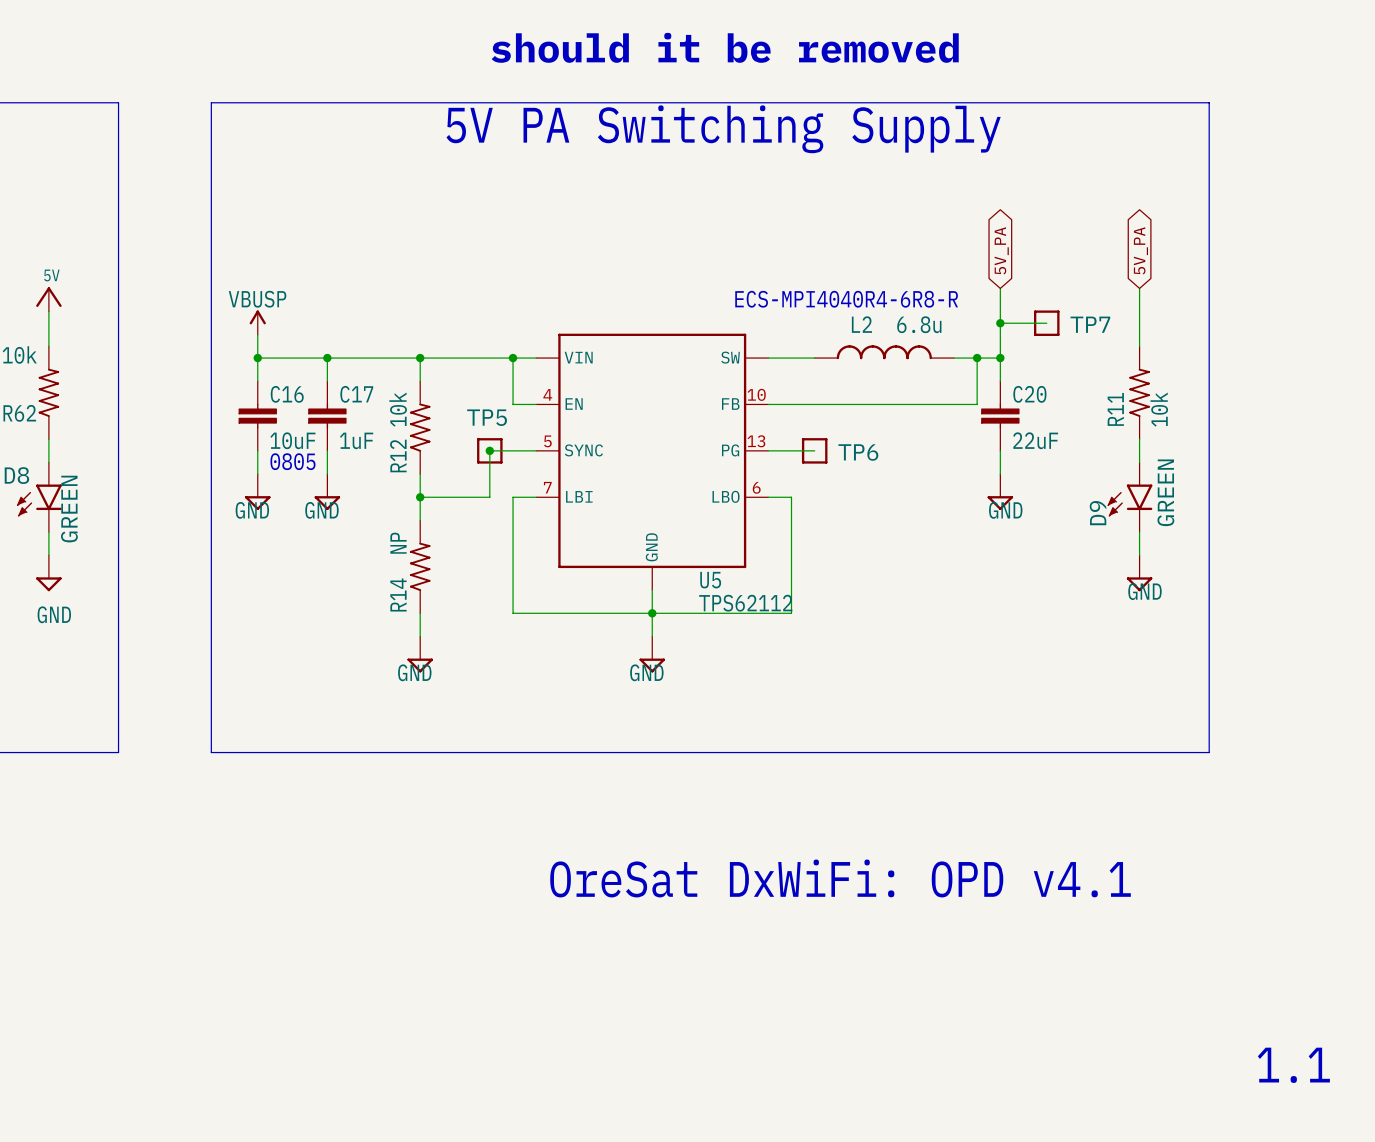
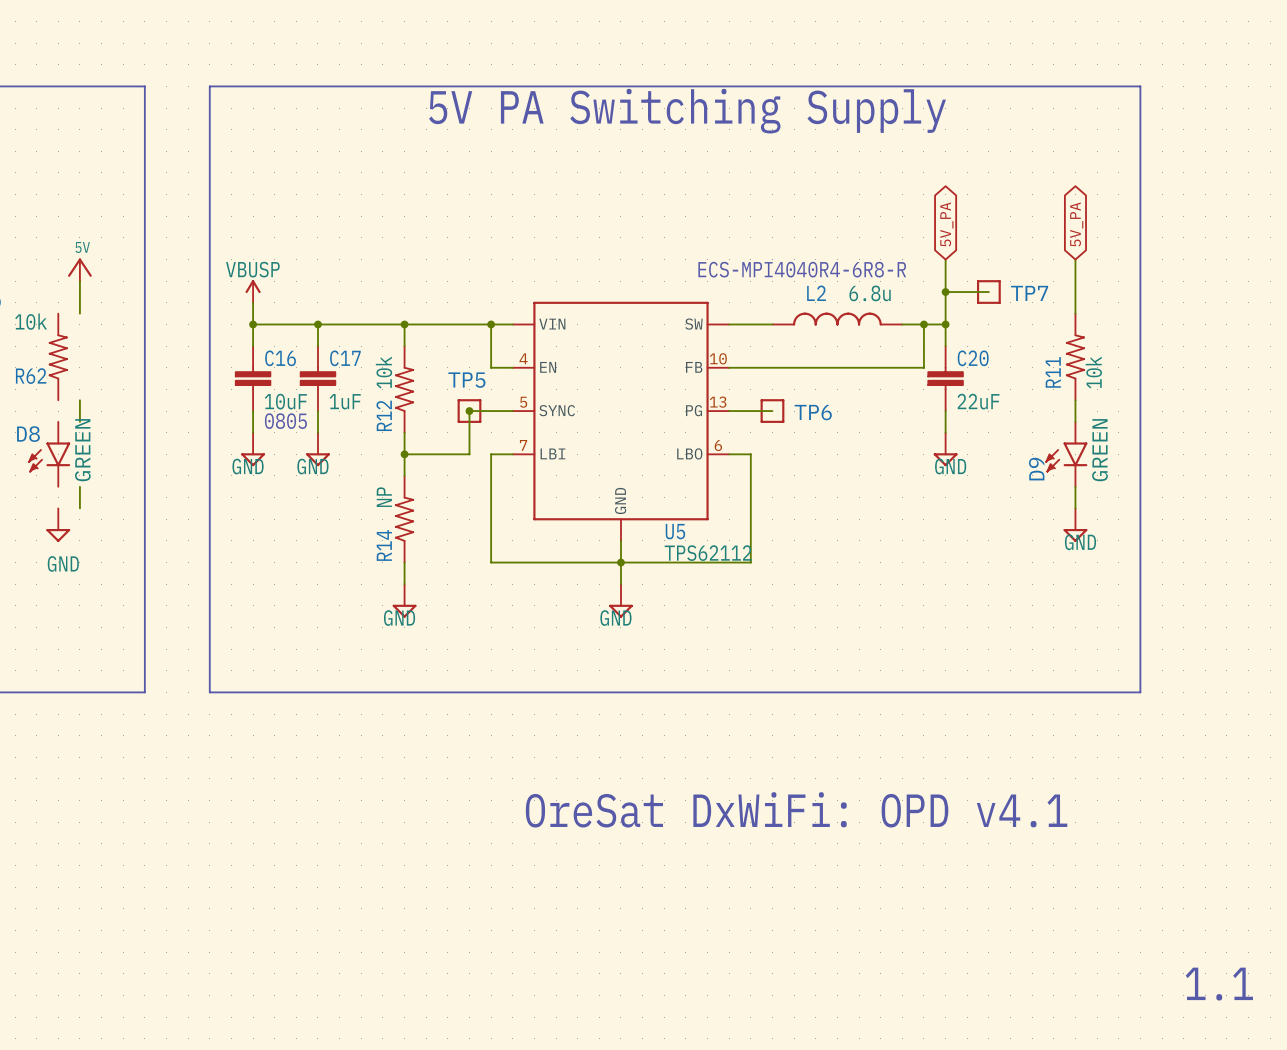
text: should it be removed (725, 47) -> none
line: (118, 102) (118, 752) -> (123, 86) (144, 86) (144, 692) (123, 692)
power symbol position: 5V (48, 299) -> 5V (79, 269)
wire: (48, 311) (48, 346) -> (79, 281) (79, 313)
wire: (48, 439) (48, 462) -> (79, 400) (79, 421)
D8 value position: GREEN (69, 509) -> GREEN (82, 450)
wire: (48, 532) (48, 555) -> (79, 486) (79, 508)

